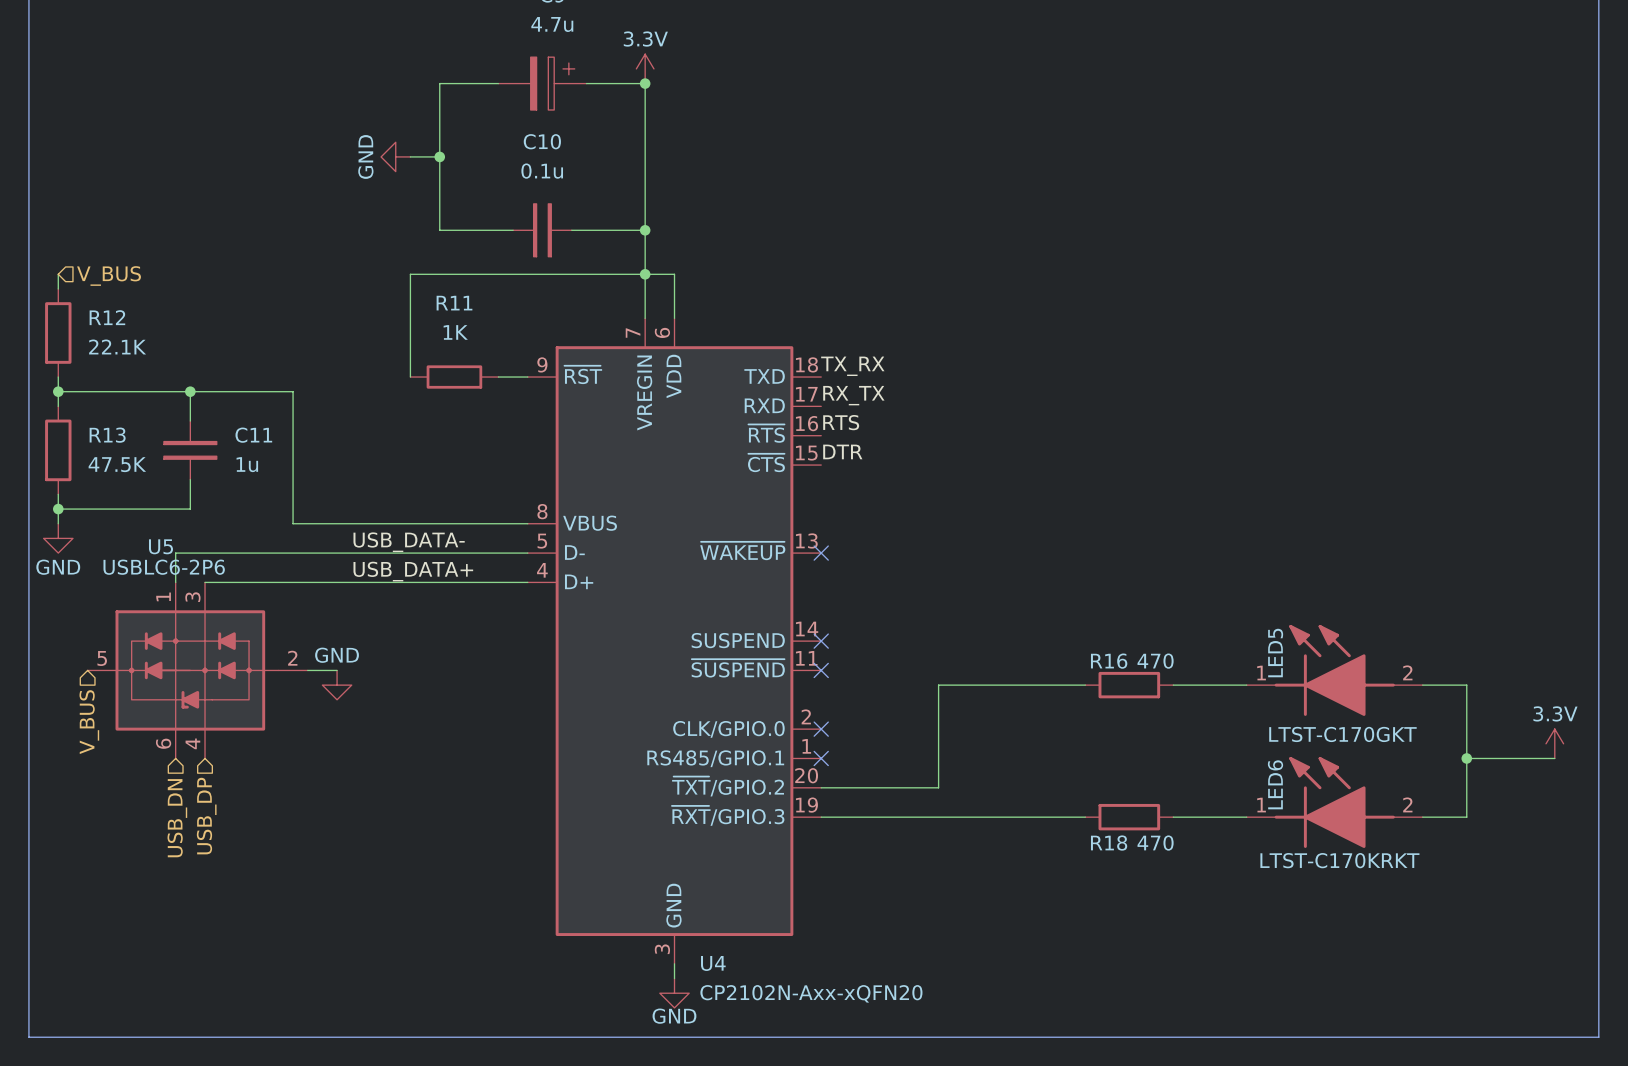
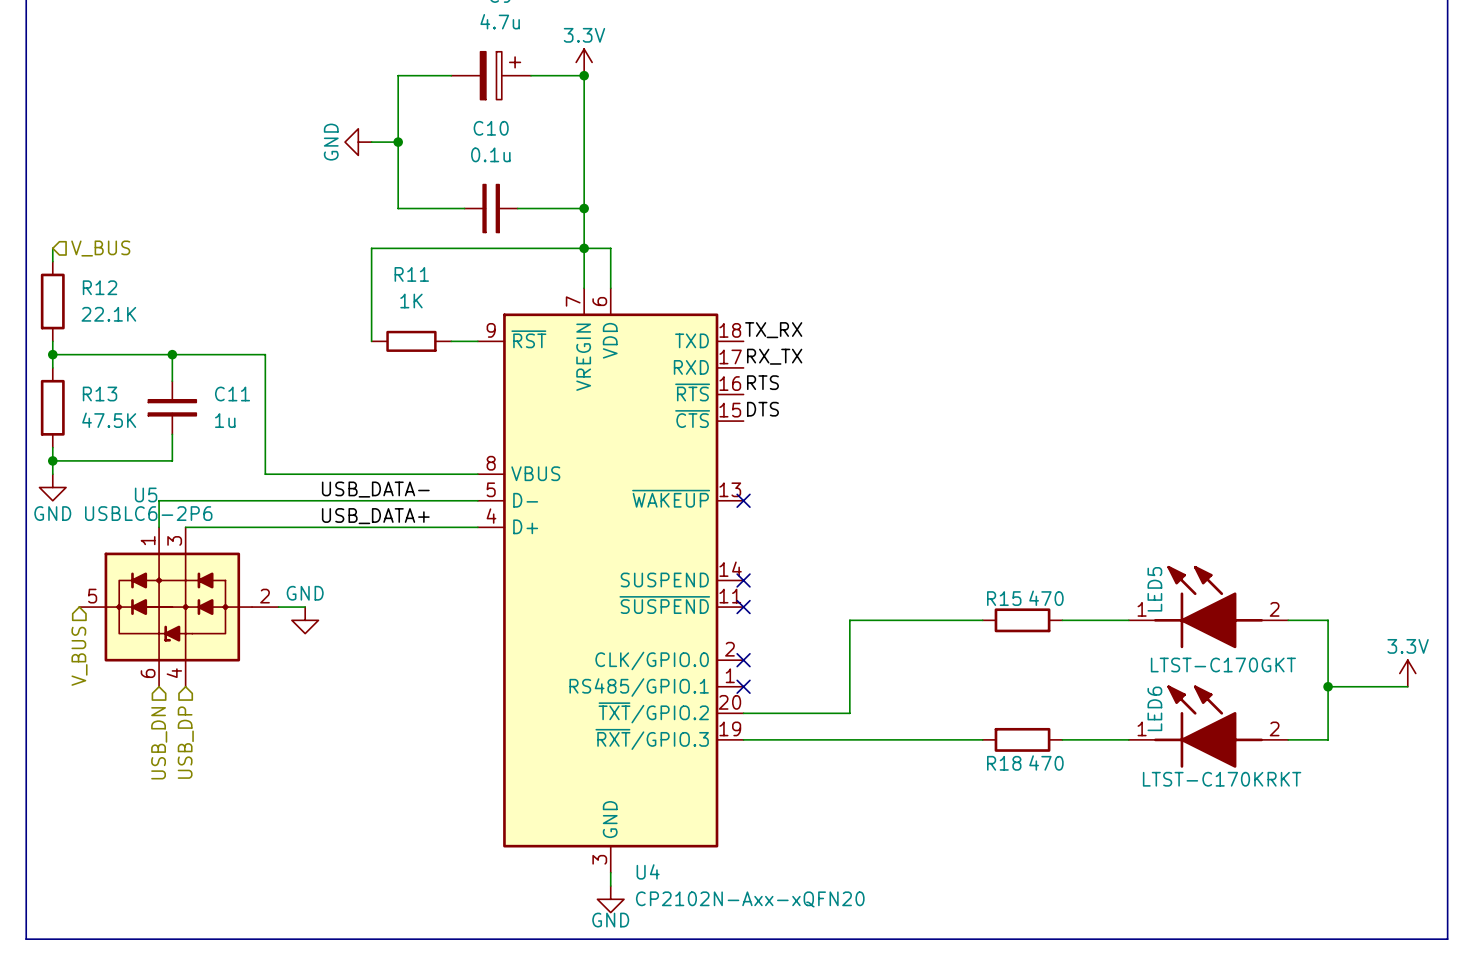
label: DTR (842, 451) -> DTS (762, 409)
R16 name: R16 (1109, 661) -> R15 (1004, 598)

